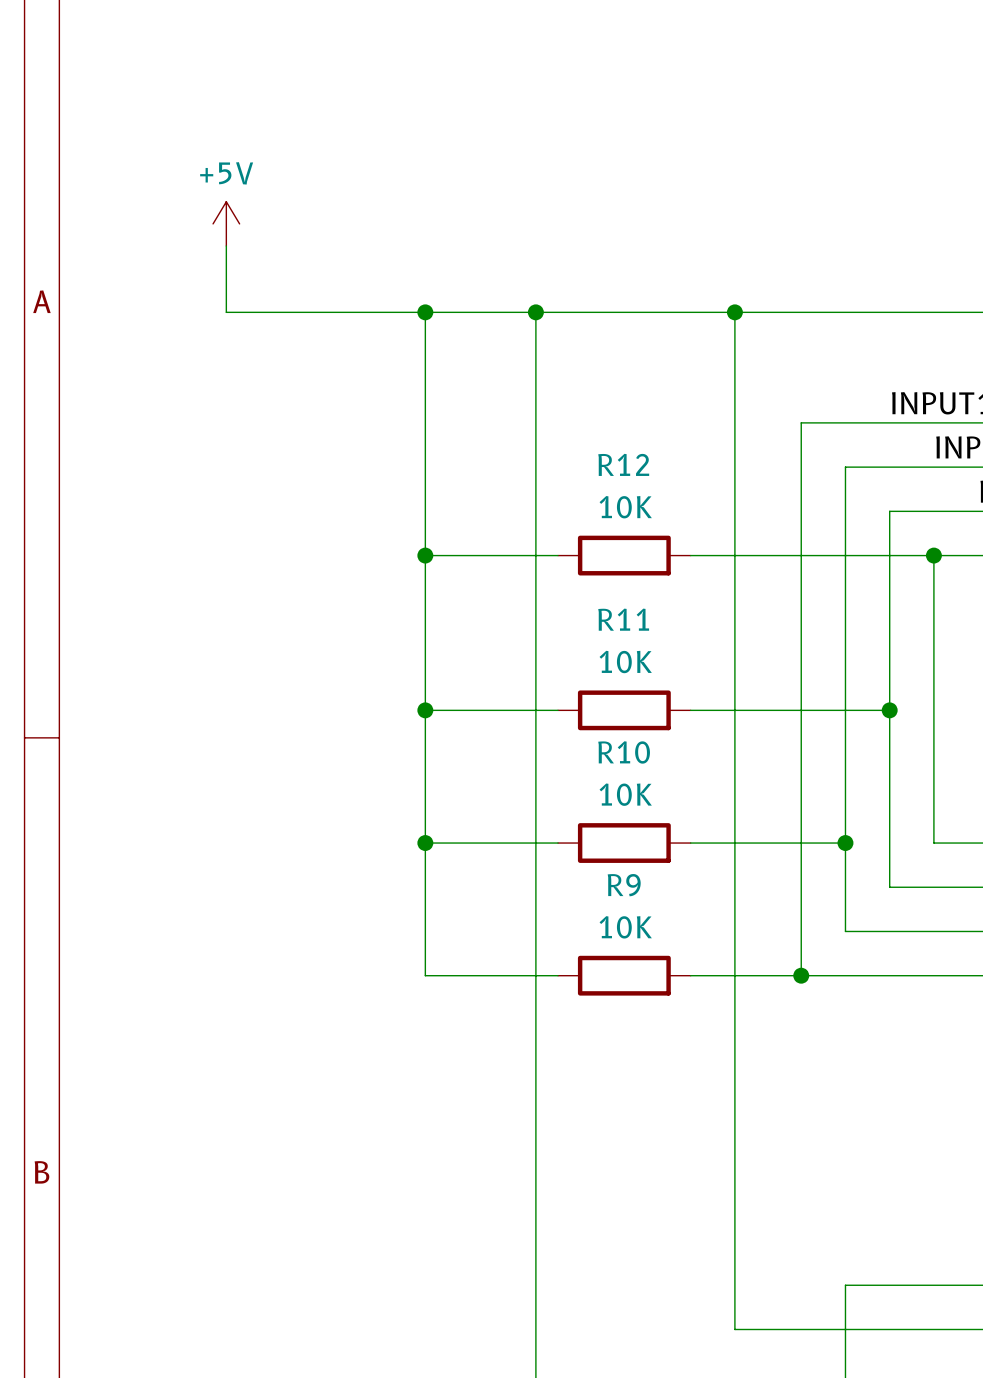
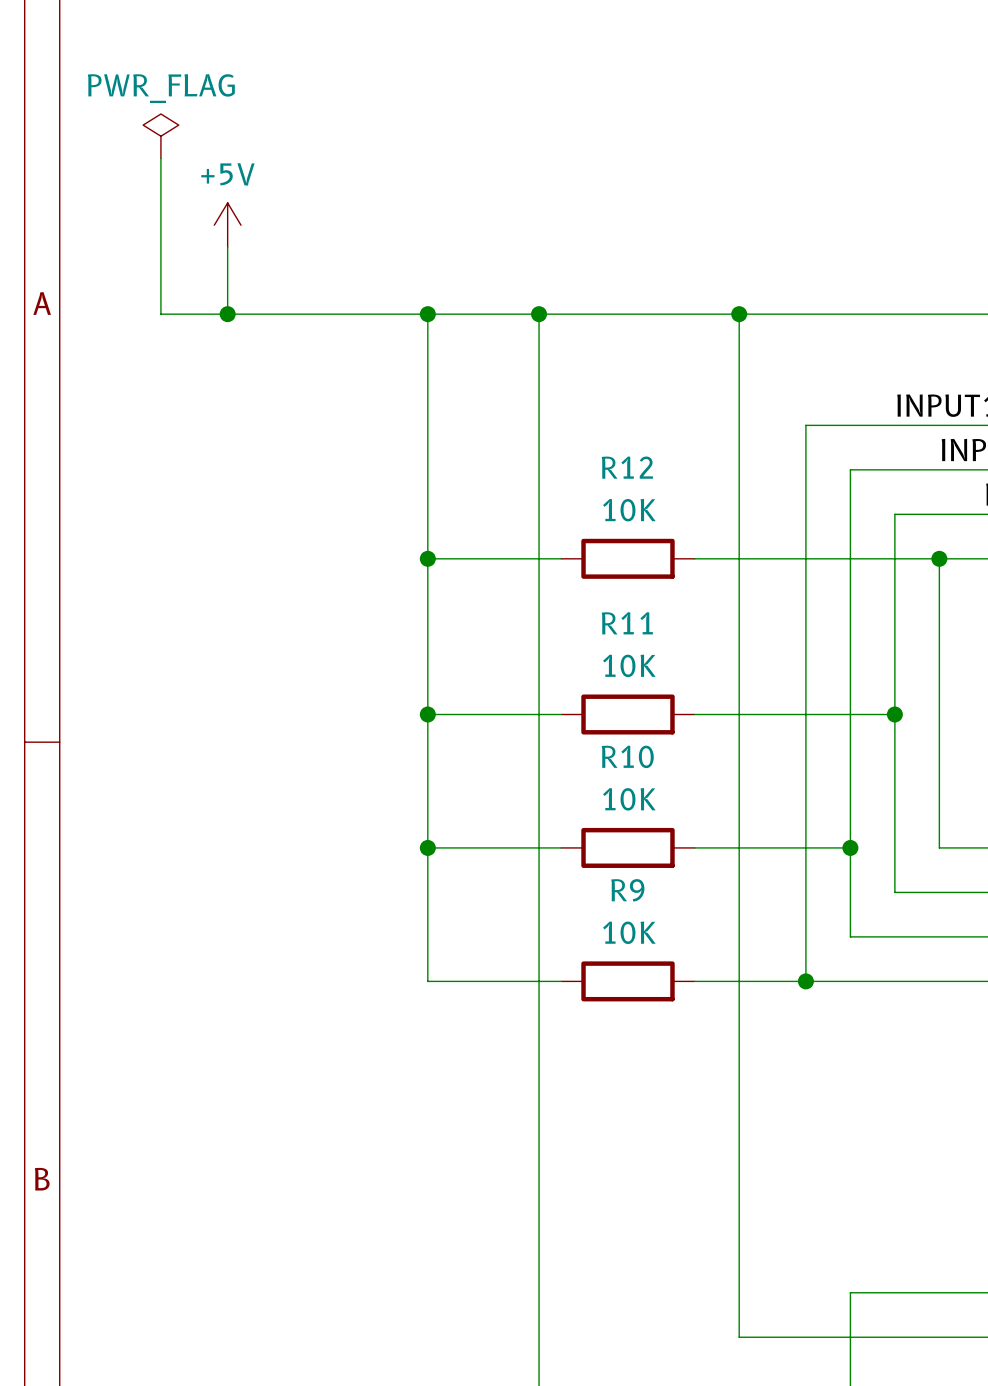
power symbol: none -> PWR_FLAG (160, 136)
wire: none -> (160, 158) (160, 314) (227, 314)
junction: none -> (227, 314)

